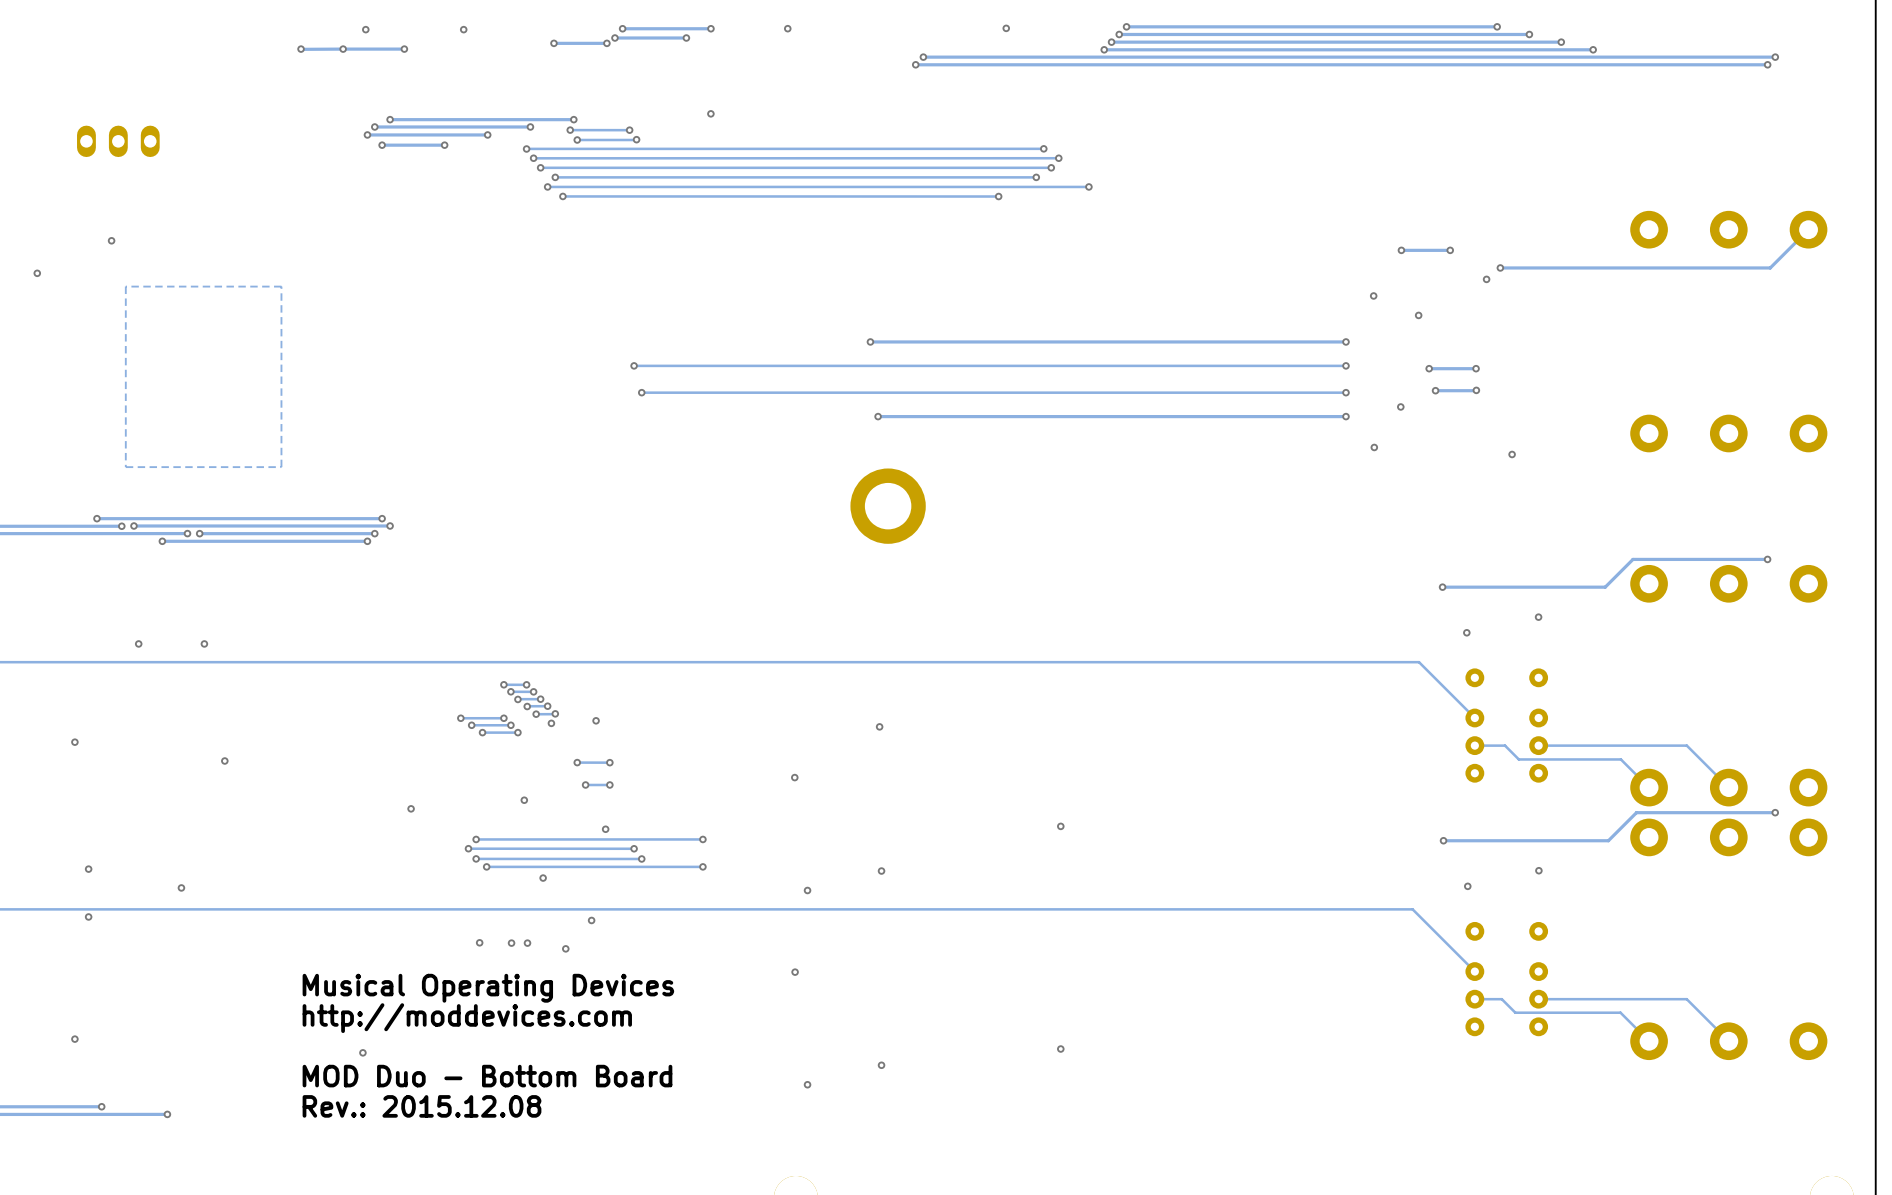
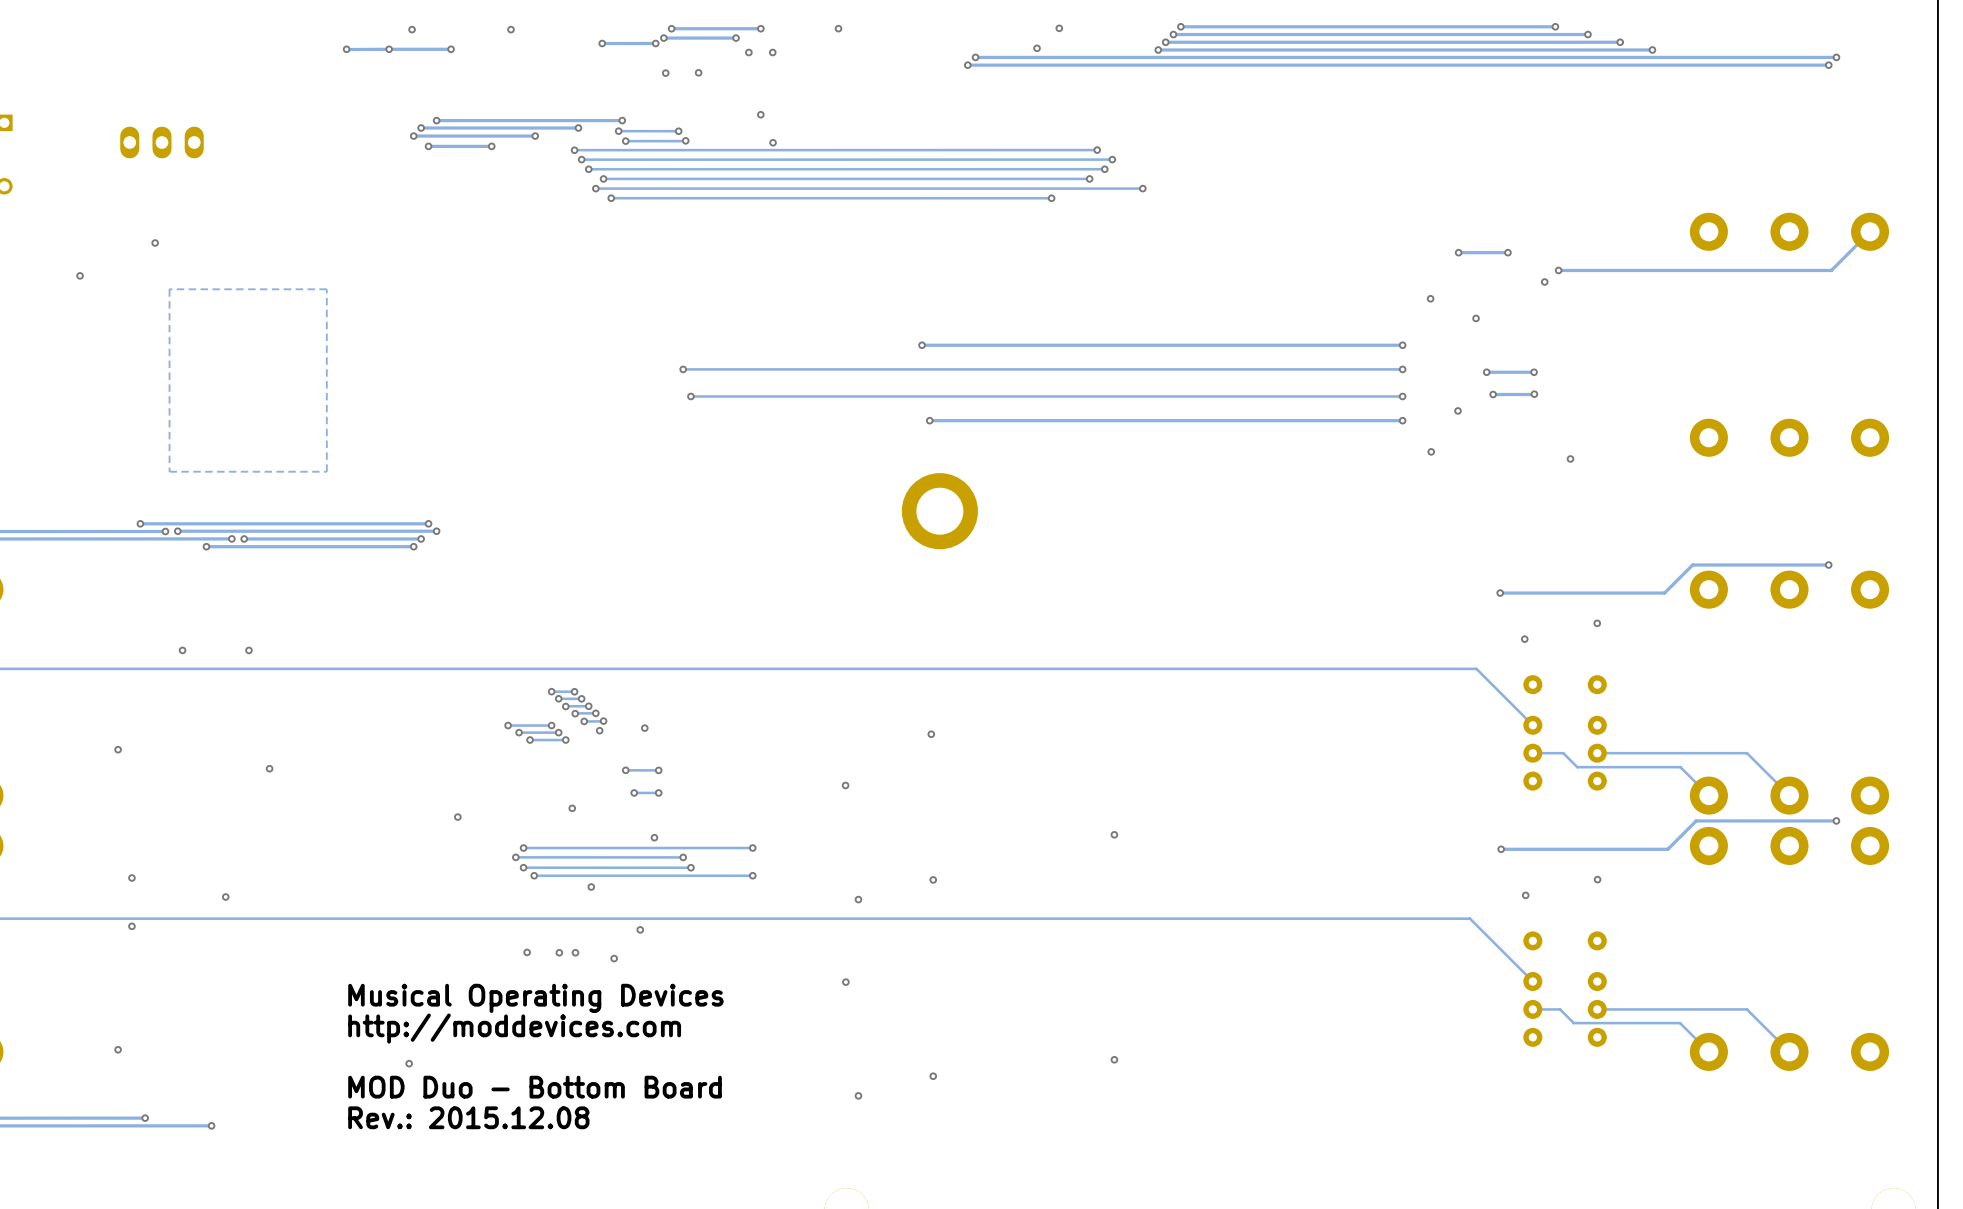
via: none -> (1037, 48)
via: none -> (748, 52)
via: none -> (772, 52)
via: none -> (665, 73)
via: none -> (698, 72)
via: none -> (773, 142)

